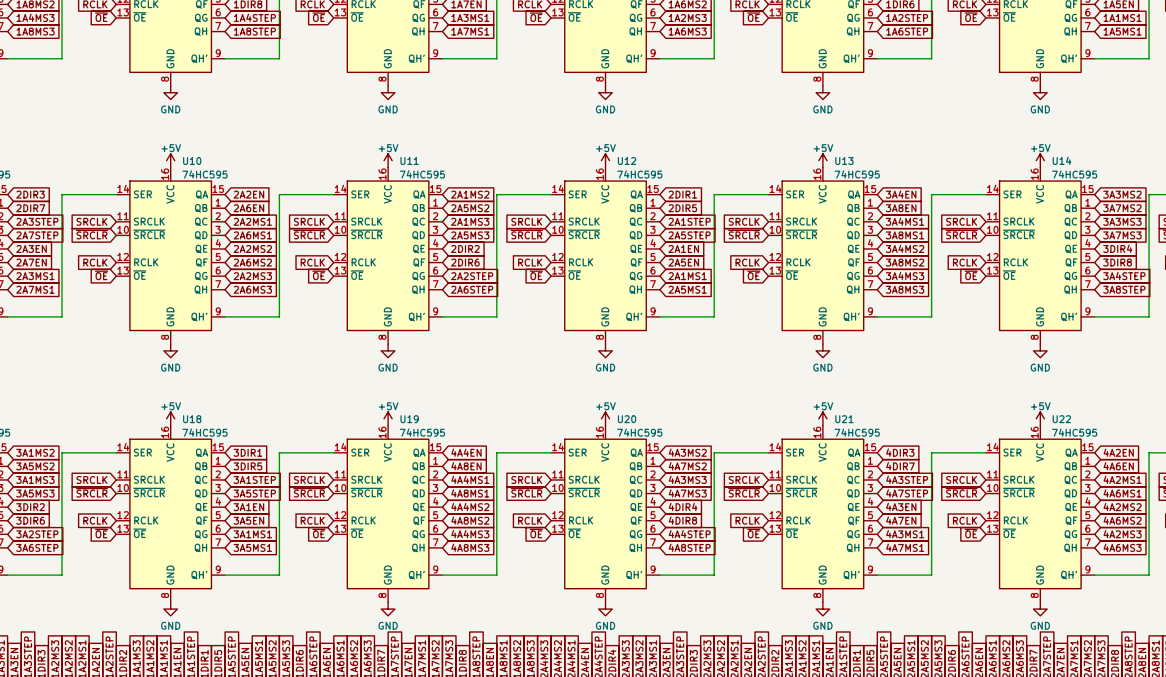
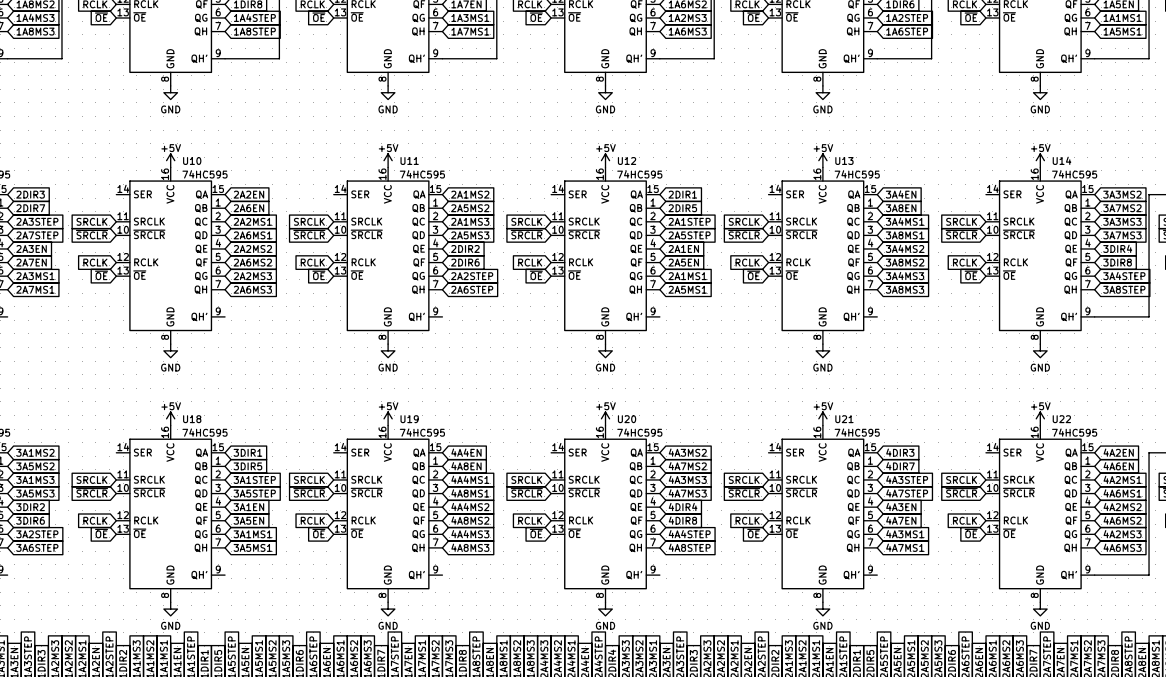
wire: (116, 194) (61, 194) (61, 316) (7, 316) -> none
wire: (333, 194) (279, 194) (279, 316) (225, 316) -> none
wire: (551, 194) (496, 194) (496, 316) (442, 316) -> none
wire: (768, 194) (714, 194) (714, 316) (659, 316) -> none
wire: (985, 194) (931, 194) (931, 316) (877, 316) -> none
wire: (116, 452) (61, 452) (61, 575) (7, 575) -> none
wire: (333, 452) (279, 452) (279, 575) (225, 575) -> none
wire: (551, 452) (496, 452) (496, 575) (442, 575) -> none
wire: (768, 452) (714, 452) (714, 575) (659, 575) -> none
wire: (985, 452) (931, 452) (931, 575) (877, 575) -> none

